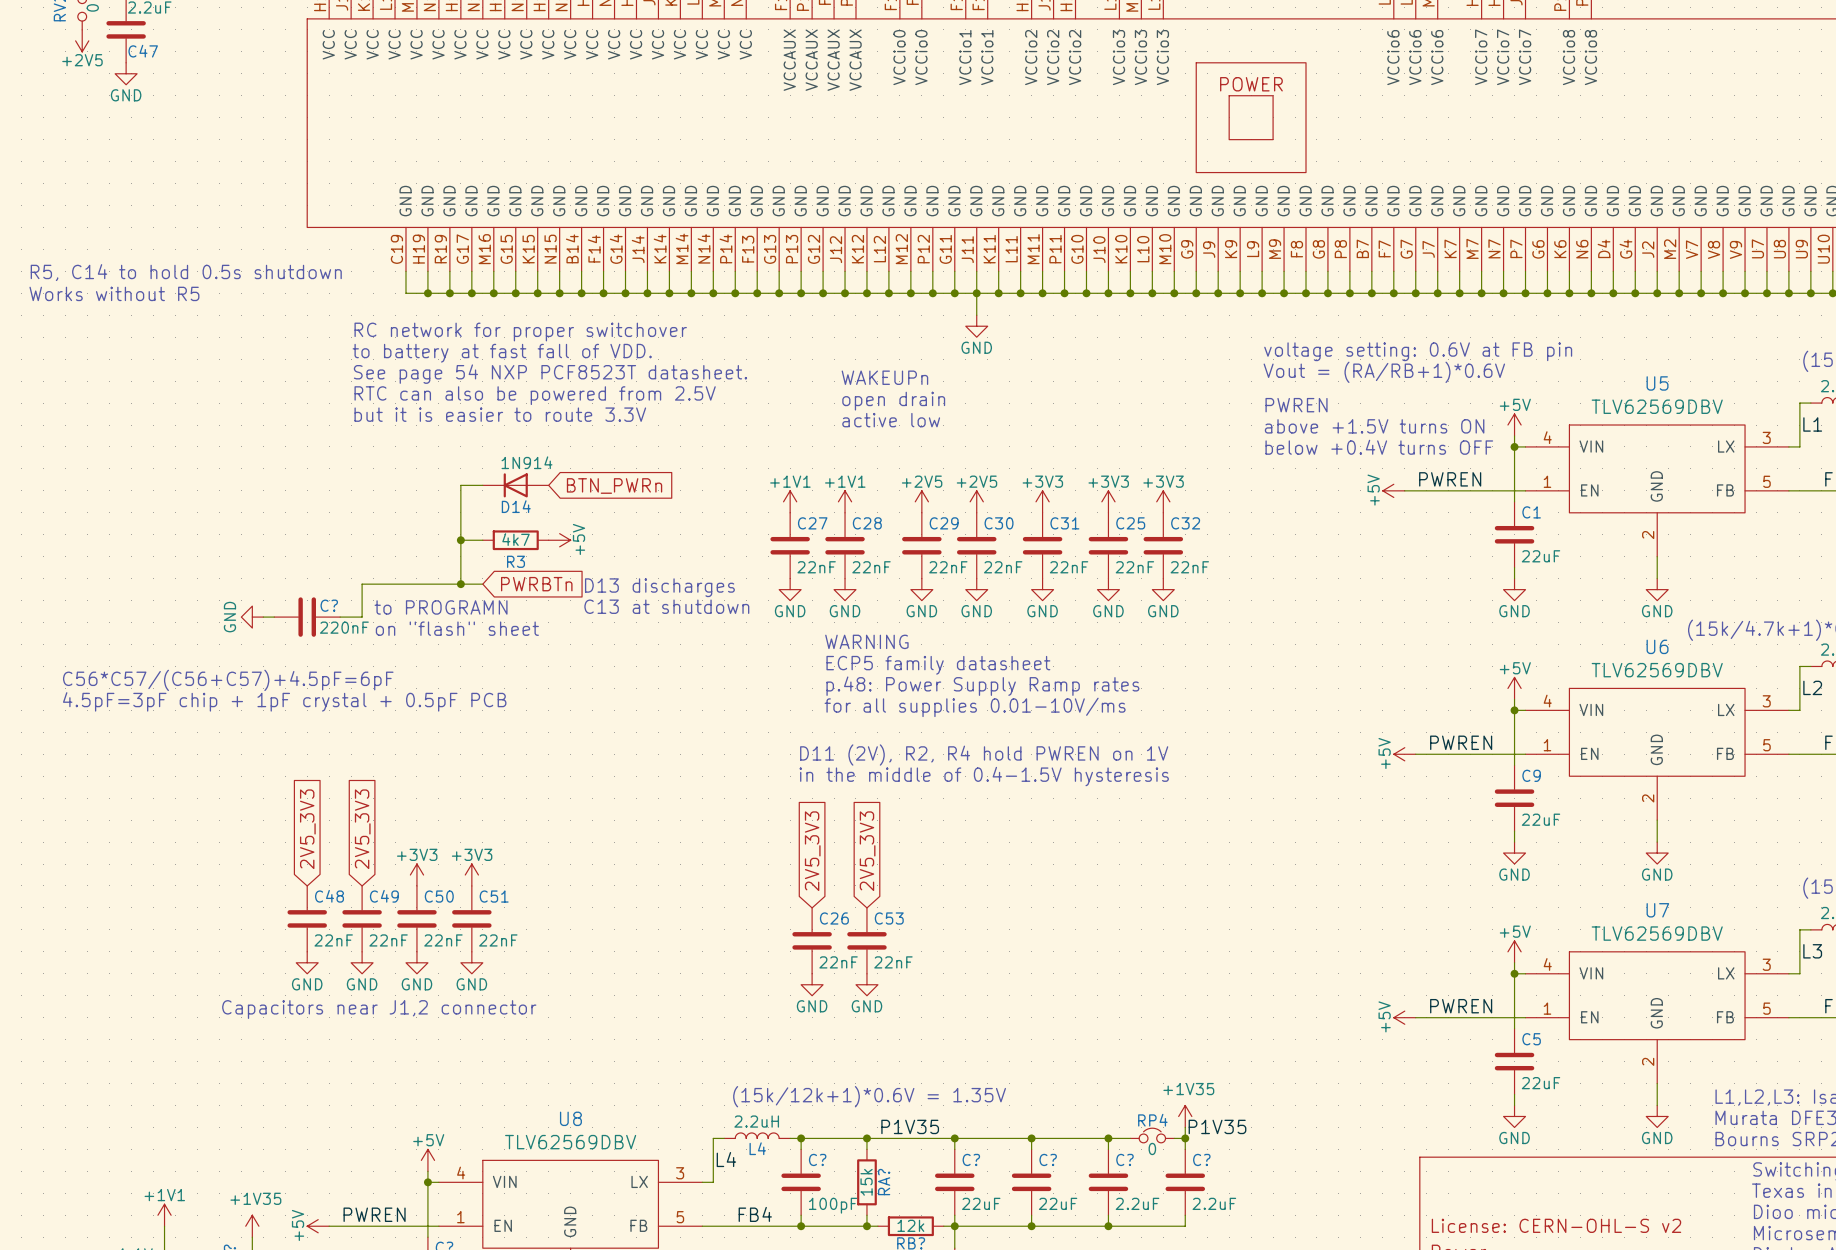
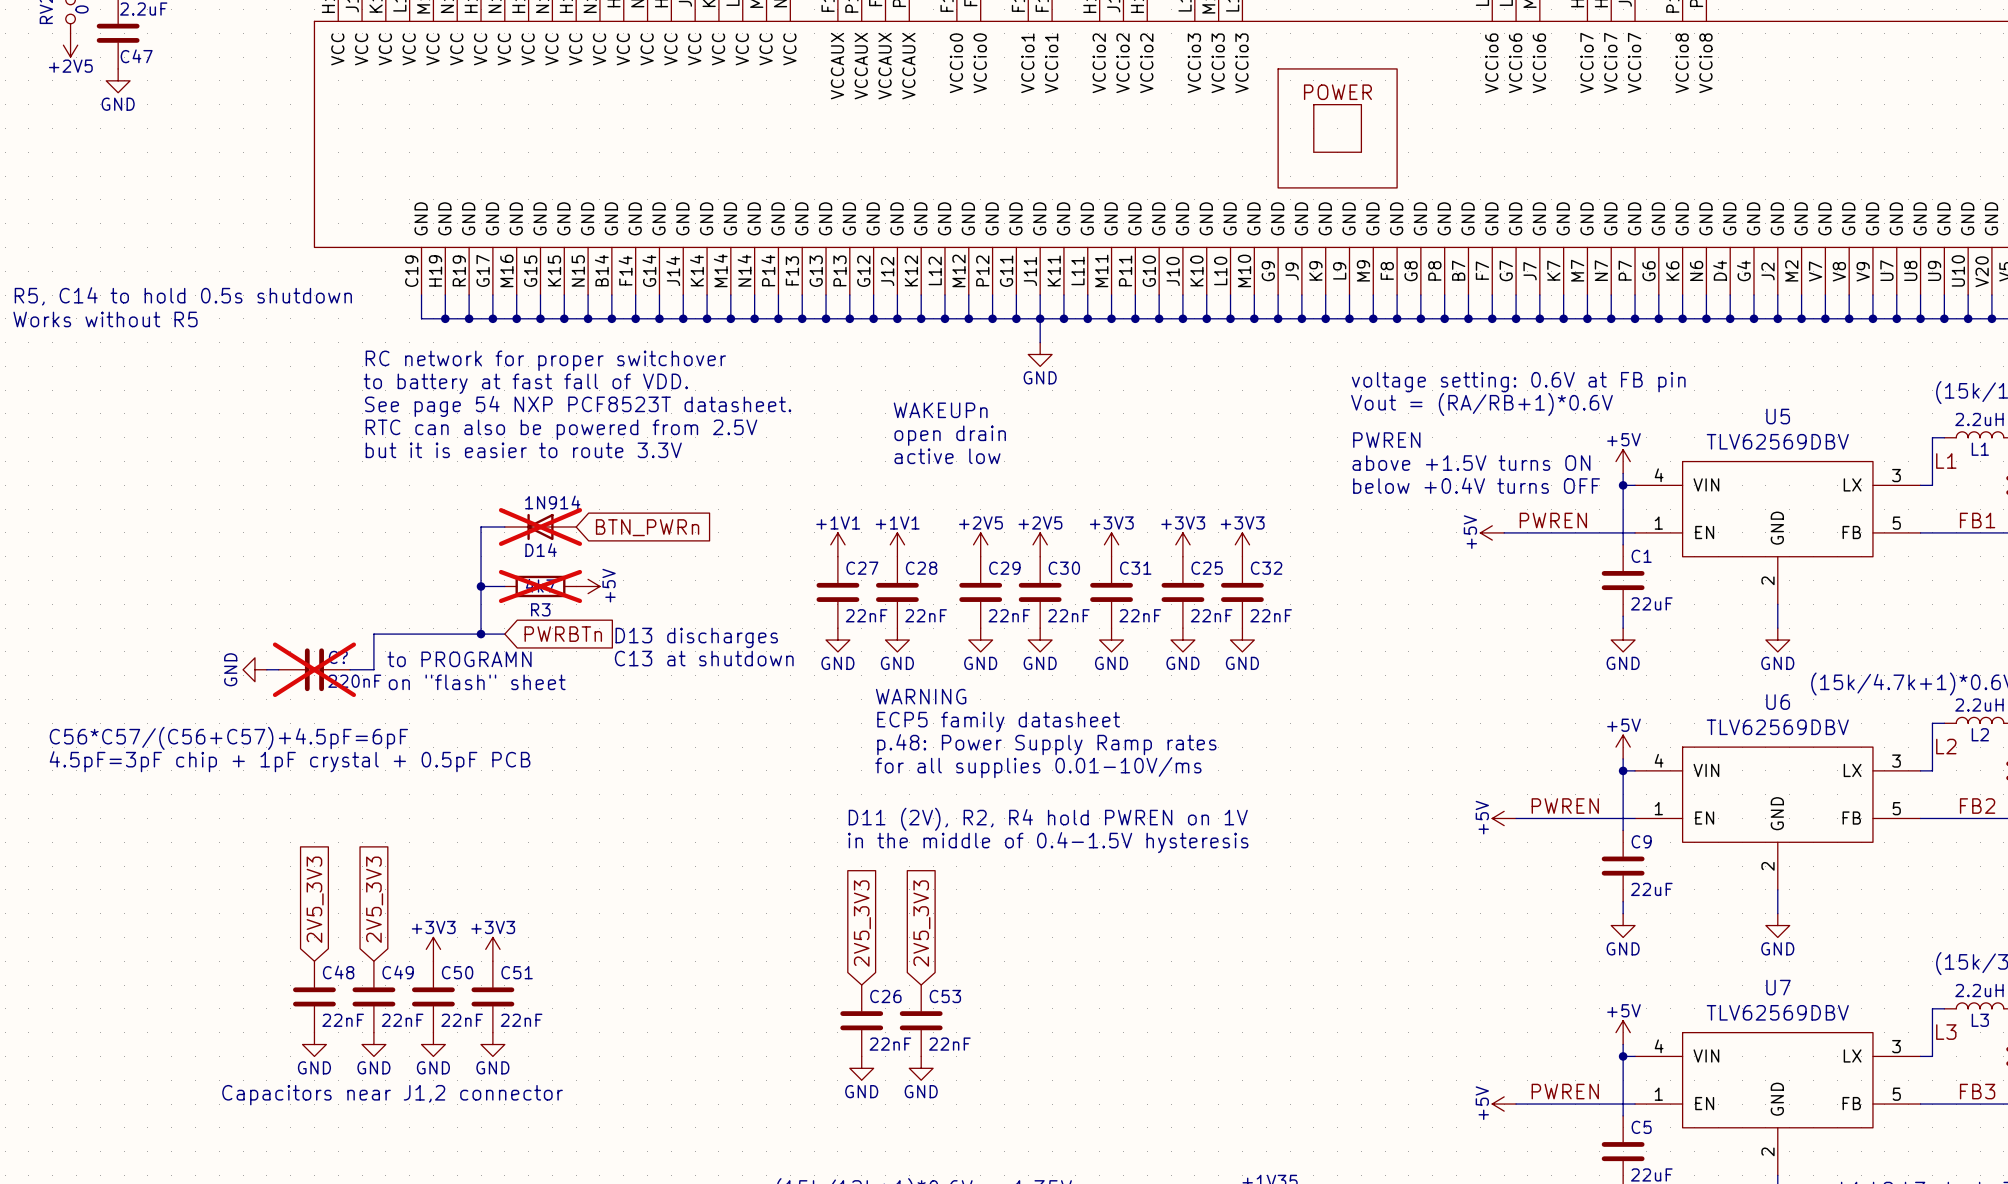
D14 do-not-place cross: none -> (540, 527)
R3 do-not-place cross: none -> (540, 586)
C? do-not-place cross: none -> (314, 669)

